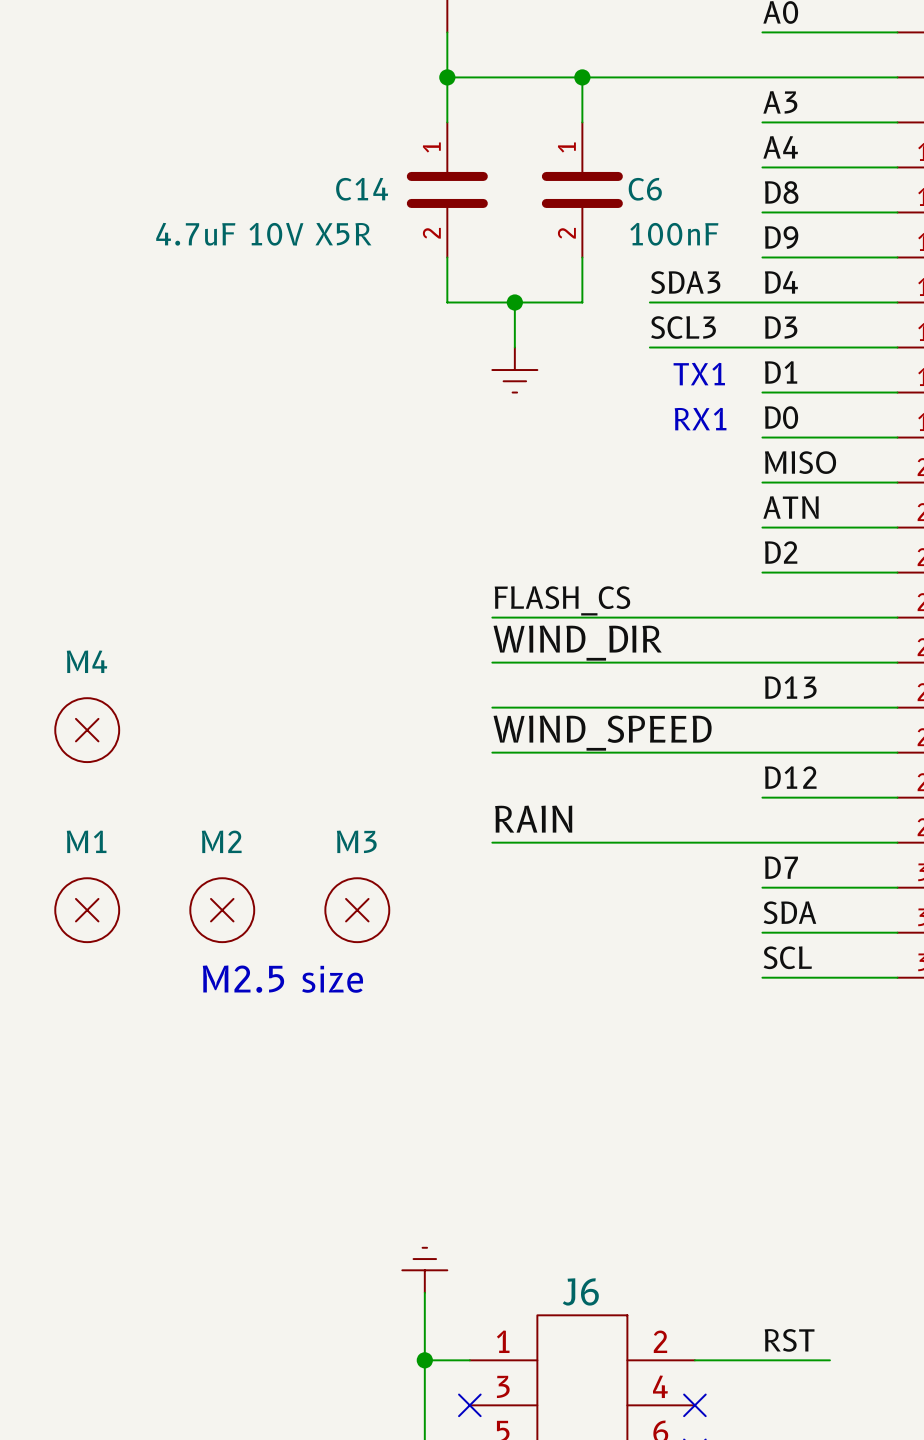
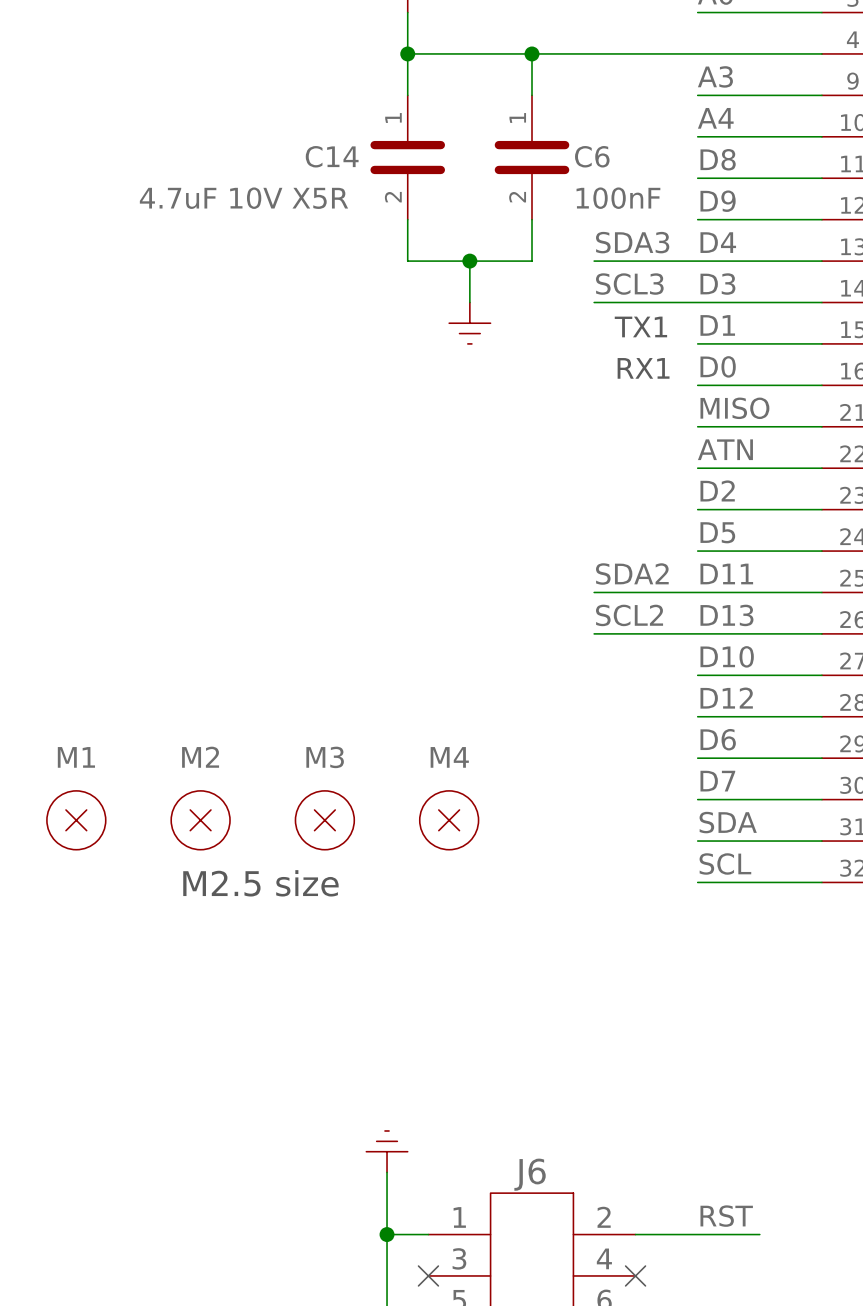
label: none -> D5 (717, 532)
label: FLASH_CS (562, 600) -> none
wire: (492, 617) (762, 617) -> none
label: none -> SDA2 (632, 574)
label: none -> D11 (726, 573)
label: WIND_DIR (577, 643) -> none
wire: (492, 662) (649, 662) -> none
label: none -> SCL2 (629, 615)
wire: (492, 707) (649, 707) -> none
M4 position: (87, 730) -> (449, 820)
label: none -> D10 (727, 656)
label: WIND_SPEED (602, 733) -> none
wire: (492, 752) (762, 752) -> none
label: RAIN (533, 819) -> none
label: none -> D6 (718, 739)
wire: (492, 842) (762, 842) -> none

